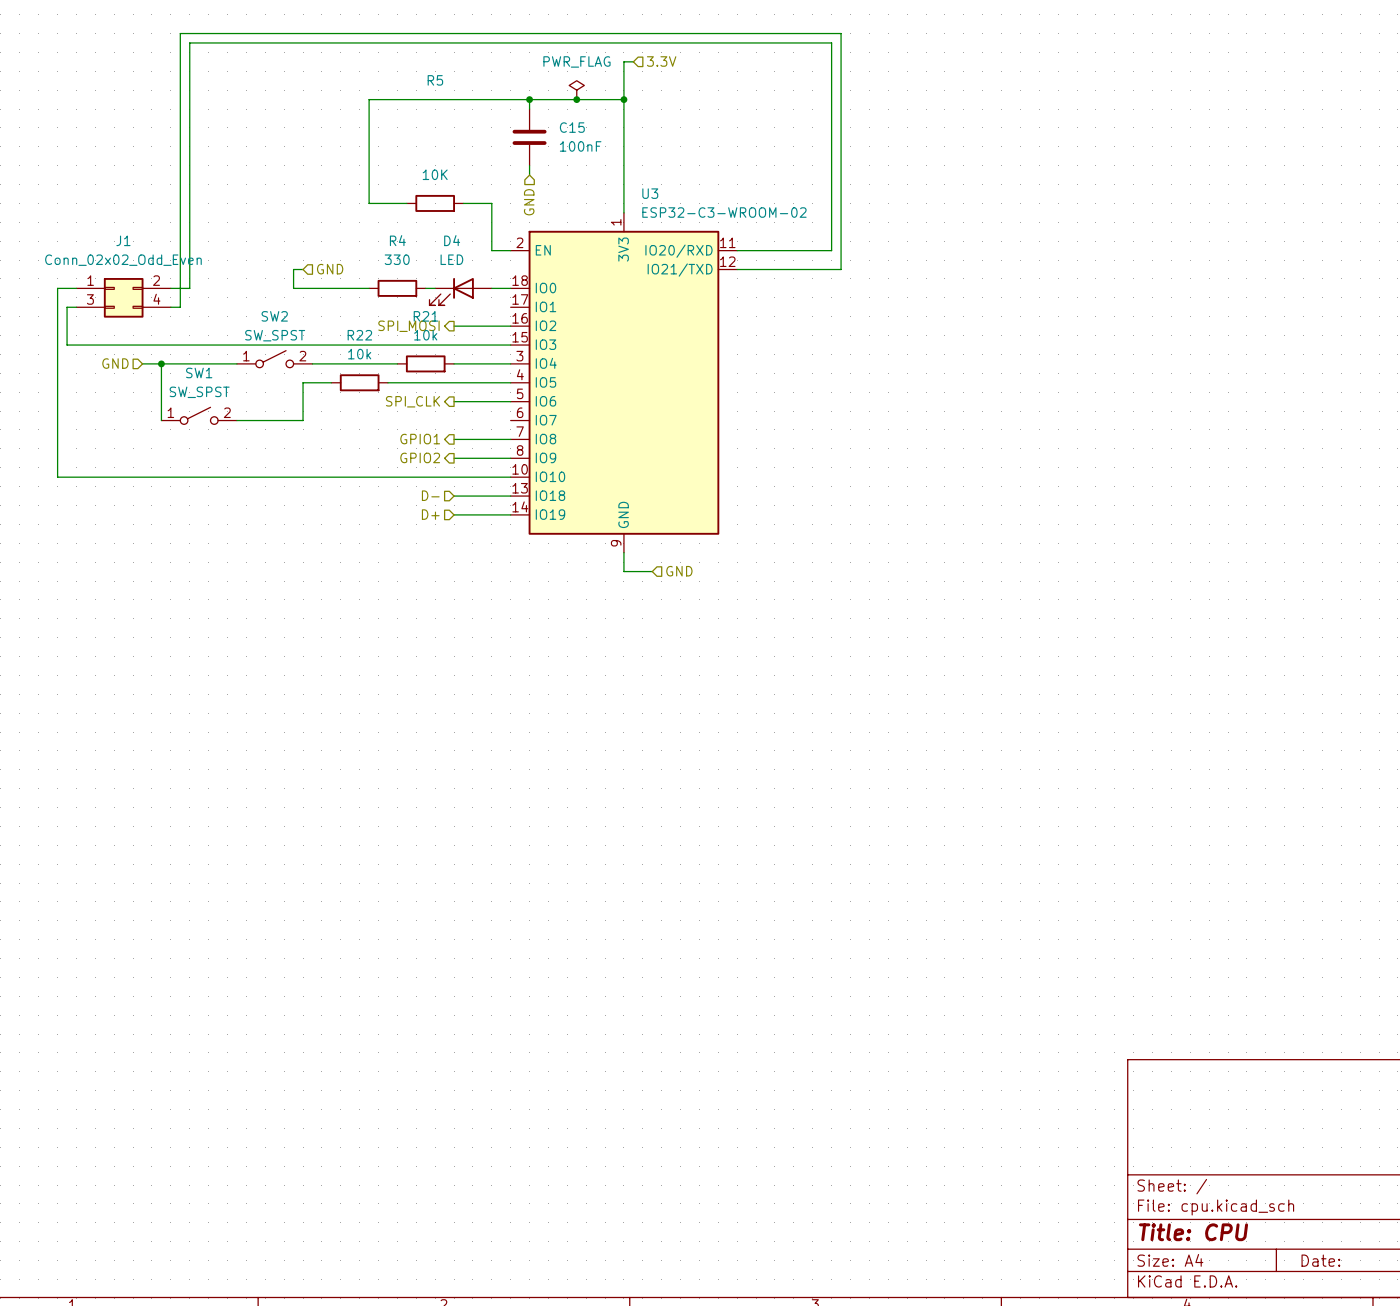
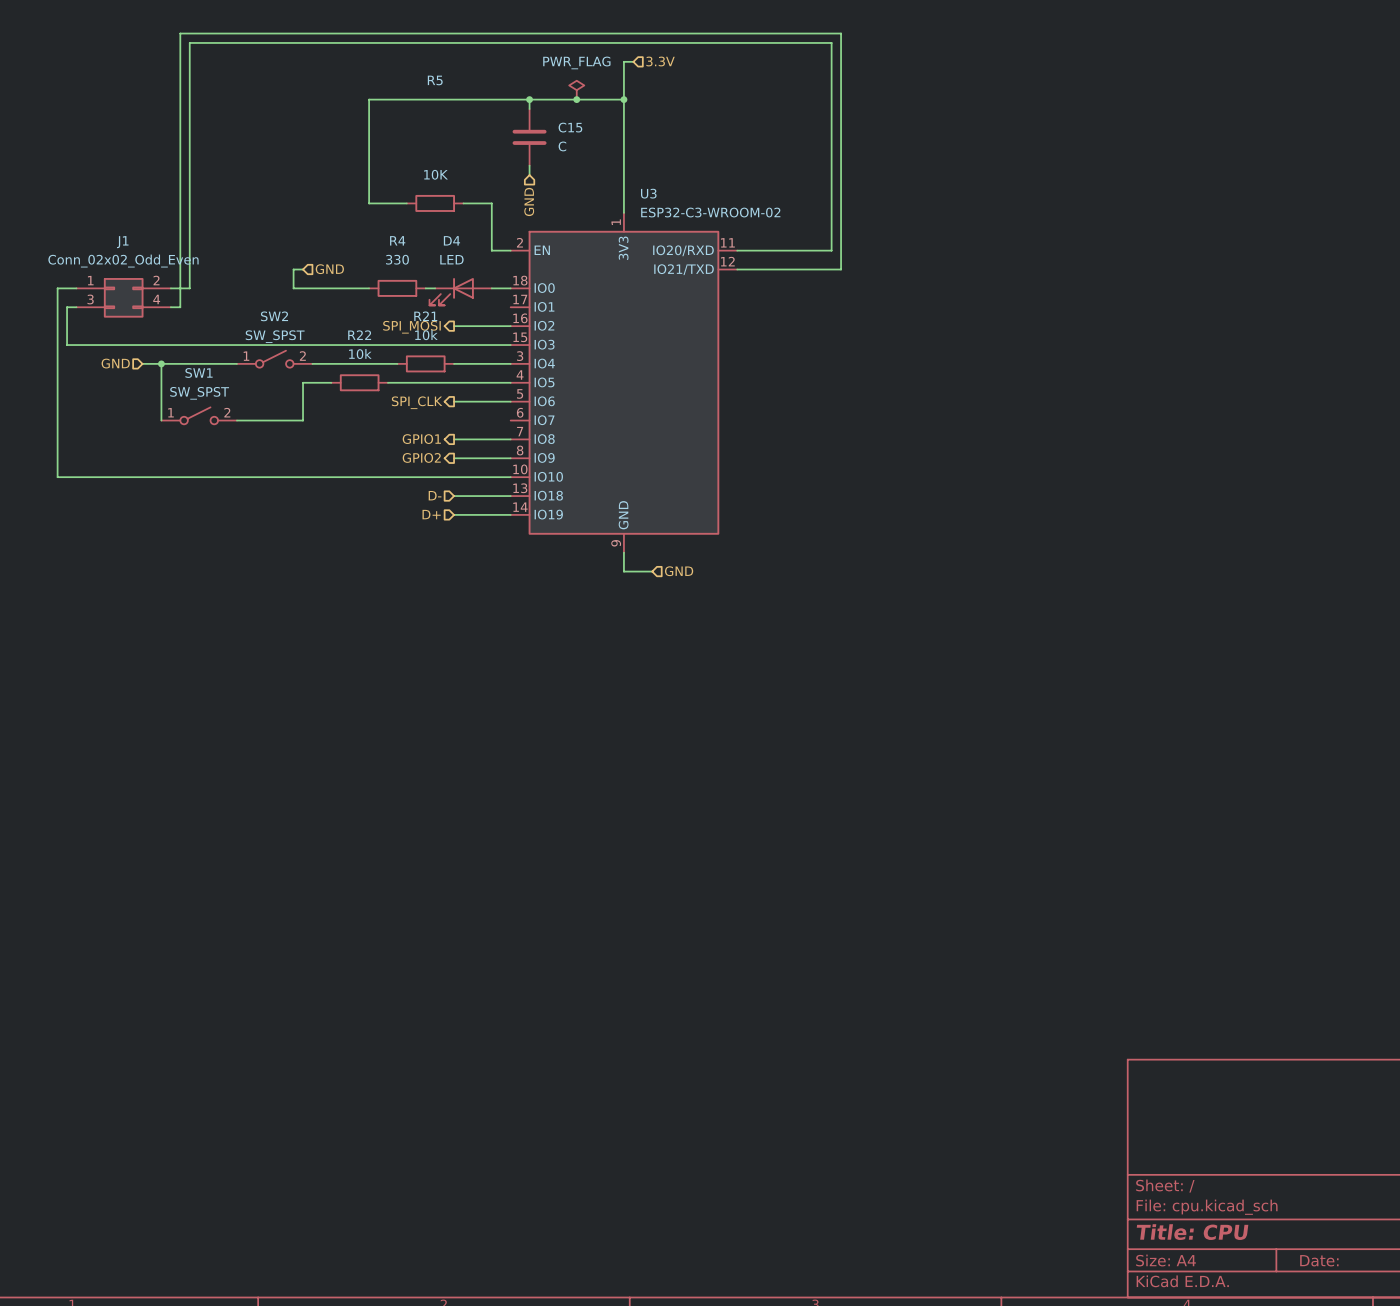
C15 value: 100nF (580, 146) -> C (562, 146)

